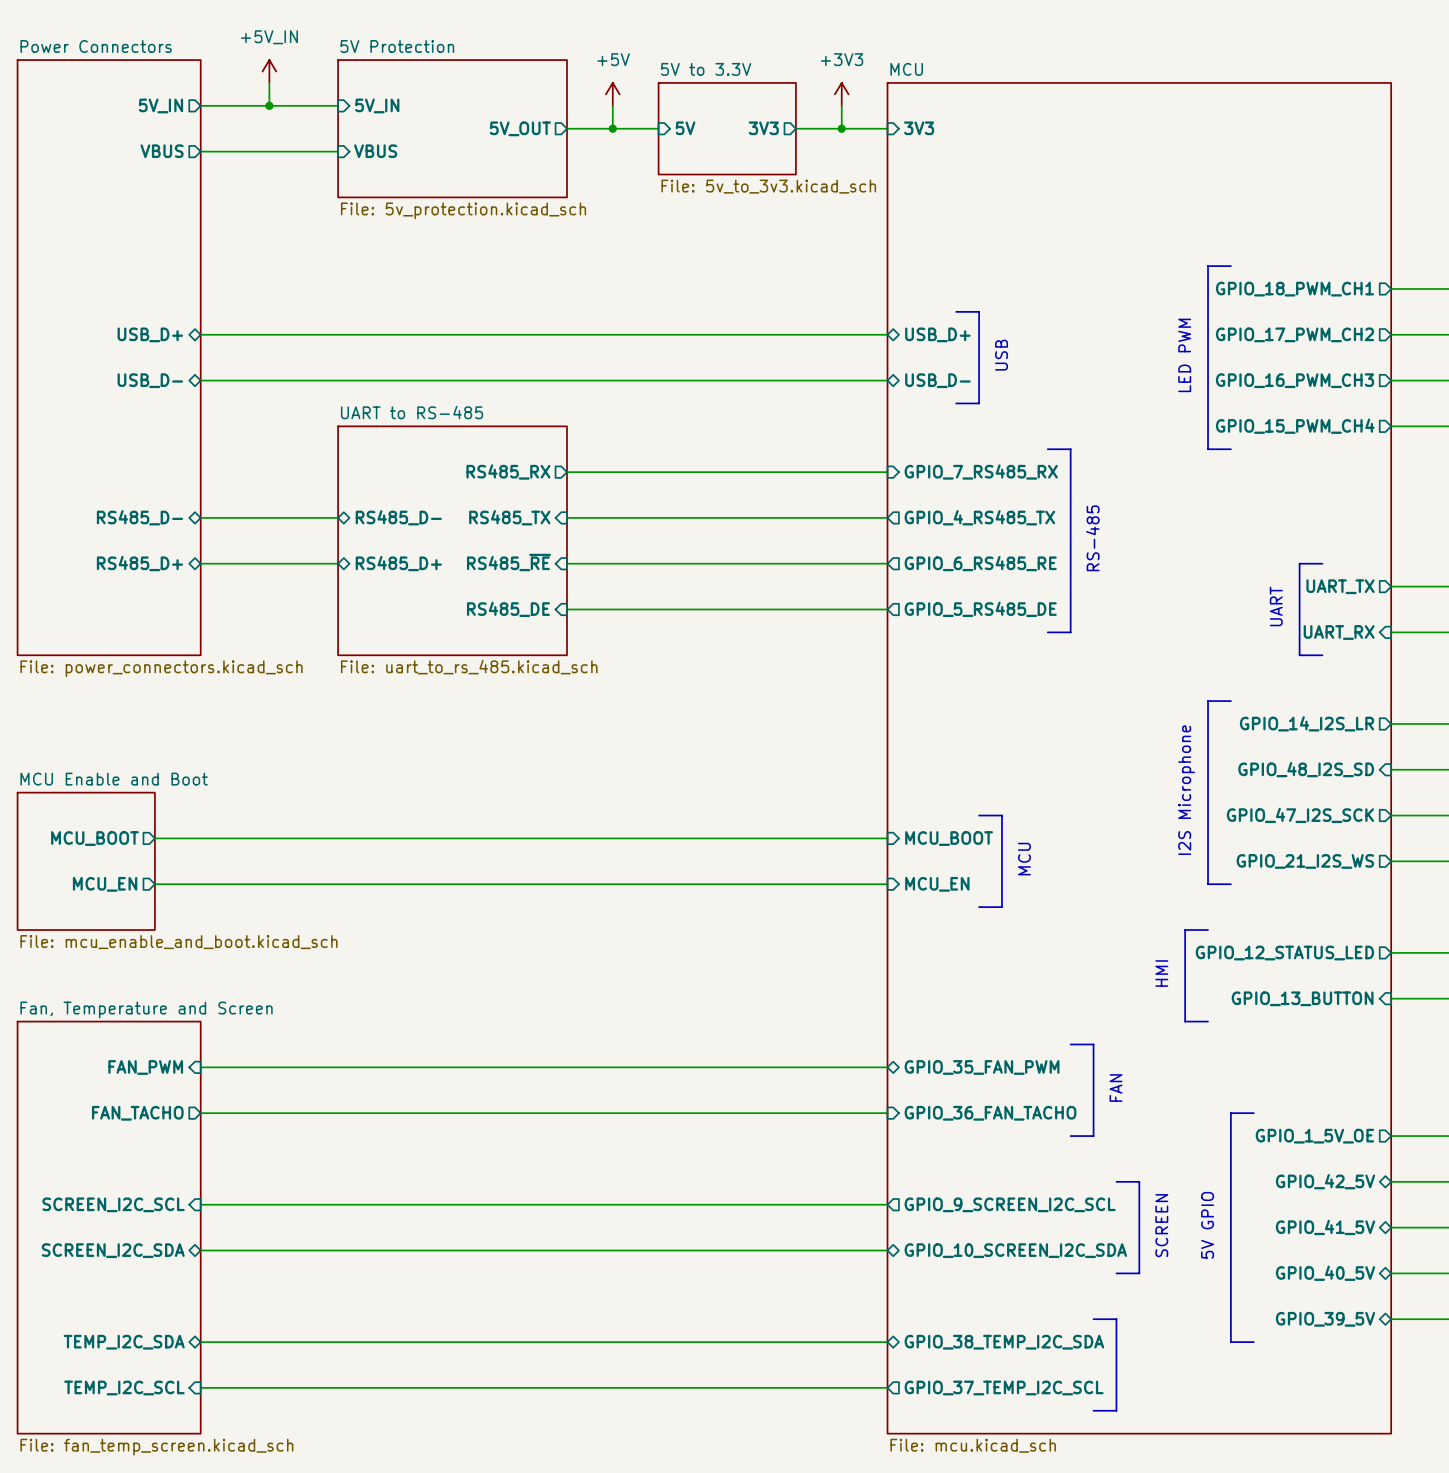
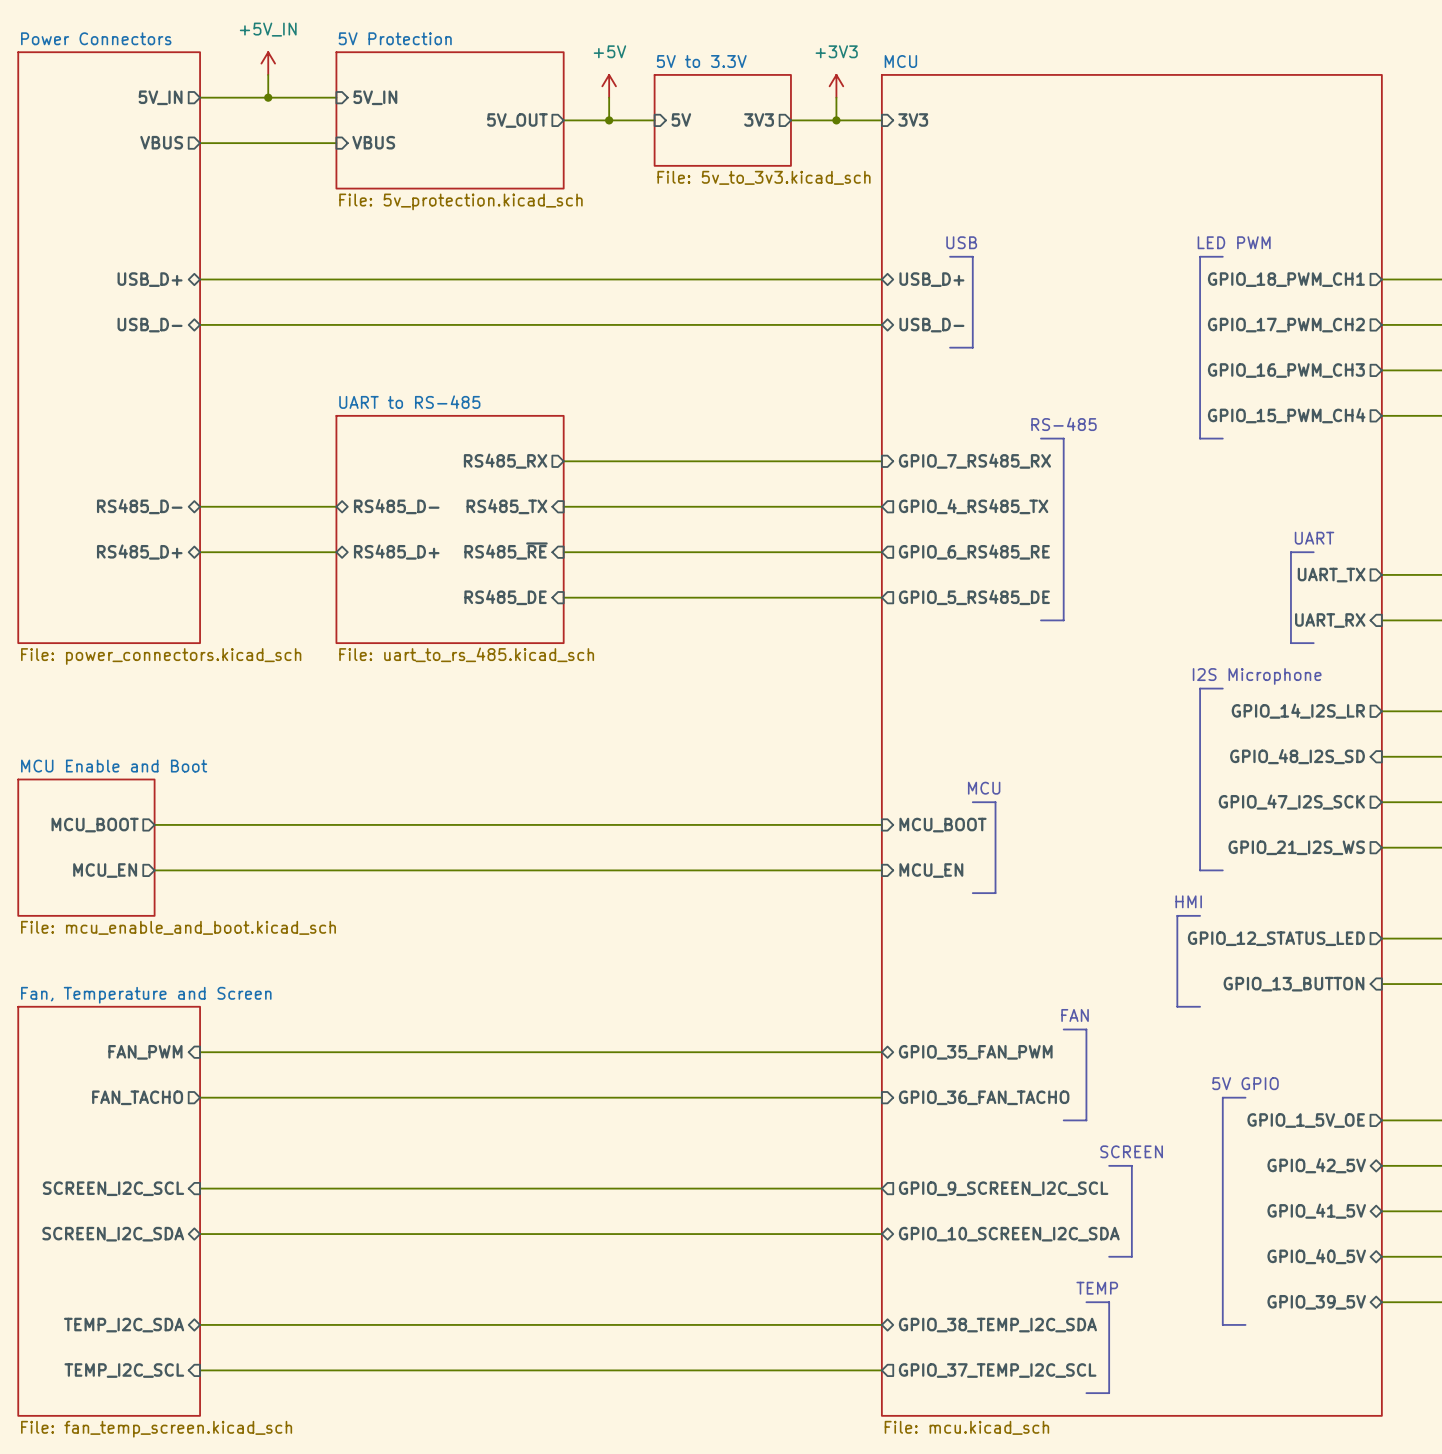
sheet pin: none -> USB_D+ (150, 279)
sheet pin: none -> USB_D+ (931, 279)
line: (956, 311) (979, 311) -> (950, 256) (972, 256) (972, 302)
sheet pin: USB_D+ (150, 334) -> USB_D- (150, 325)
sheet pin: USB_D+ (937, 334) -> USB_D- (931, 325)
text rotation: 0° (1001, 355) -> 90° clockwise (961, 242)
text position: USB (1001, 355) -> USB (961, 242)
text rotation: 0° (1184, 355) -> 90° clockwise (1234, 242)
text position: LED PWM (1184, 355) -> LED PWM (1234, 242)
line: (979, 357) (979, 403) (956, 403) -> (972, 347) (950, 347)
sheet pin: USB_D- (150, 380) -> none
wire: (200, 380) (887, 380) -> (200, 279) (881, 279)
sheet pin: USB_D- (937, 380) -> none
text rotation: 0° (1092, 538) -> 90° clockwise (1063, 424)
text position: RS-485 (1092, 538) -> RS-485 (1063, 424)
text rotation: 0° (1276, 606) -> 90° clockwise (1314, 538)
text position: UART (1276, 606) -> UART (1314, 538)
text rotation: 0° (1186, 790) -> 90° clockwise (1257, 676)
text rotation: 0° (1024, 859) -> 90° clockwise (984, 788)
text position: MCU (1024, 859) -> MCU (984, 788)
text rotation: 0° (1161, 973) -> 90° clockwise (1188, 901)
text position: HMI (1161, 973) -> HMI (1188, 901)
text rotation: 0° (1116, 1088) -> 90° clockwise (1075, 1015)
text position: FAN (1116, 1088) -> FAN (1075, 1015)
text rotation: 0° (1161, 1225) -> 90° clockwise (1131, 1151)
text rotation: 0° (1207, 1225) -> 90° clockwise (1245, 1083)
text position: 5V GPIO (1207, 1225) -> 5V GPIO (1245, 1083)
text: none -> TEMP (1097, 1288)

